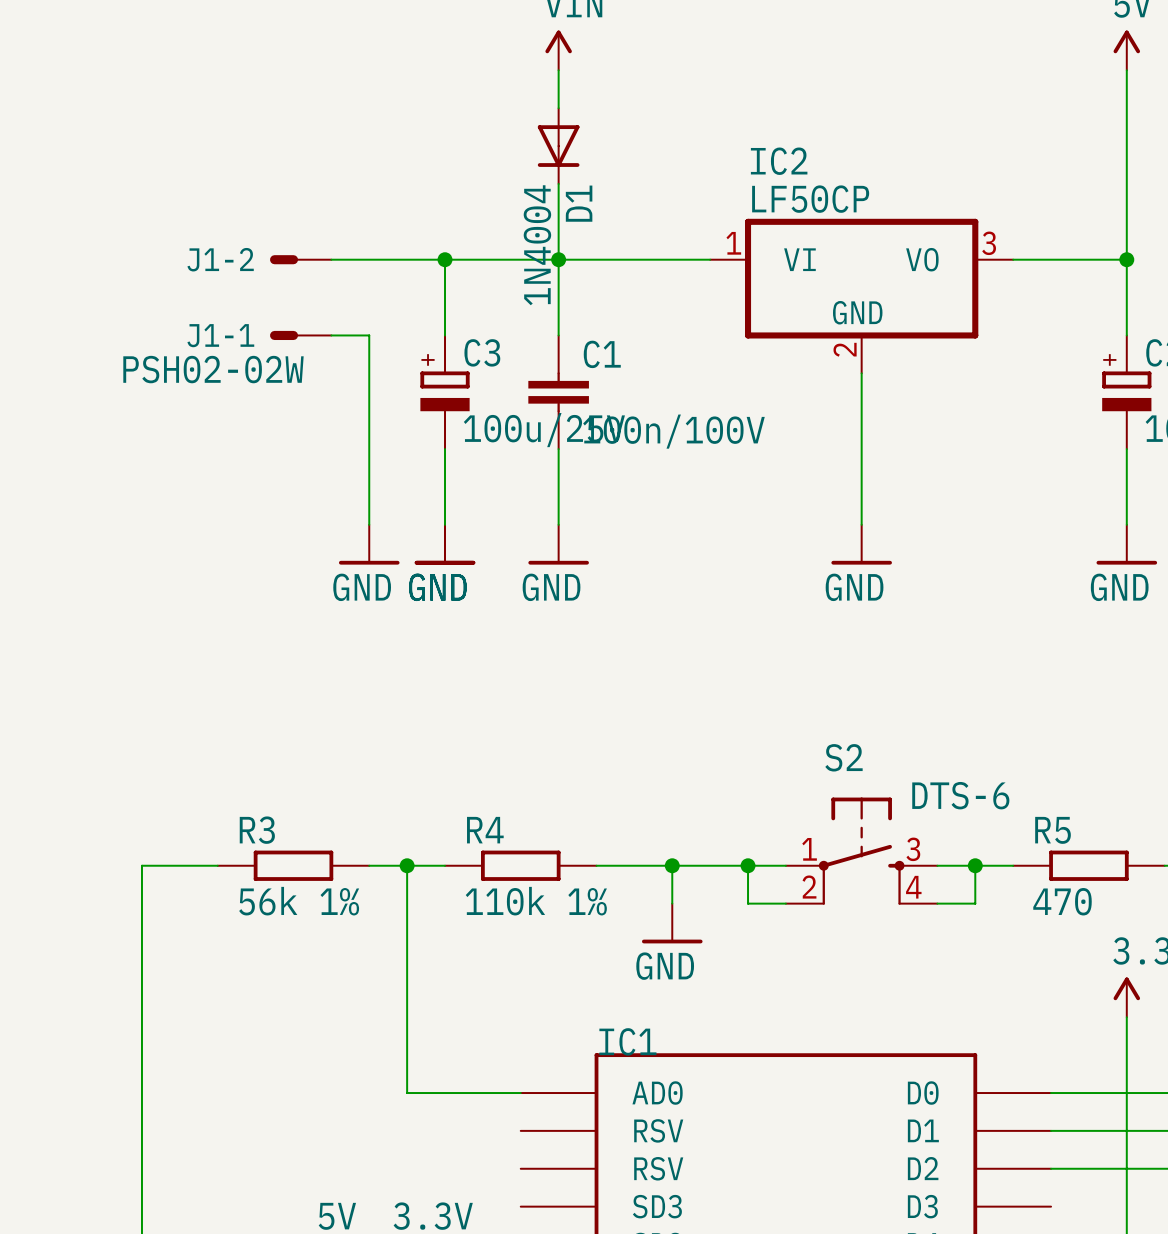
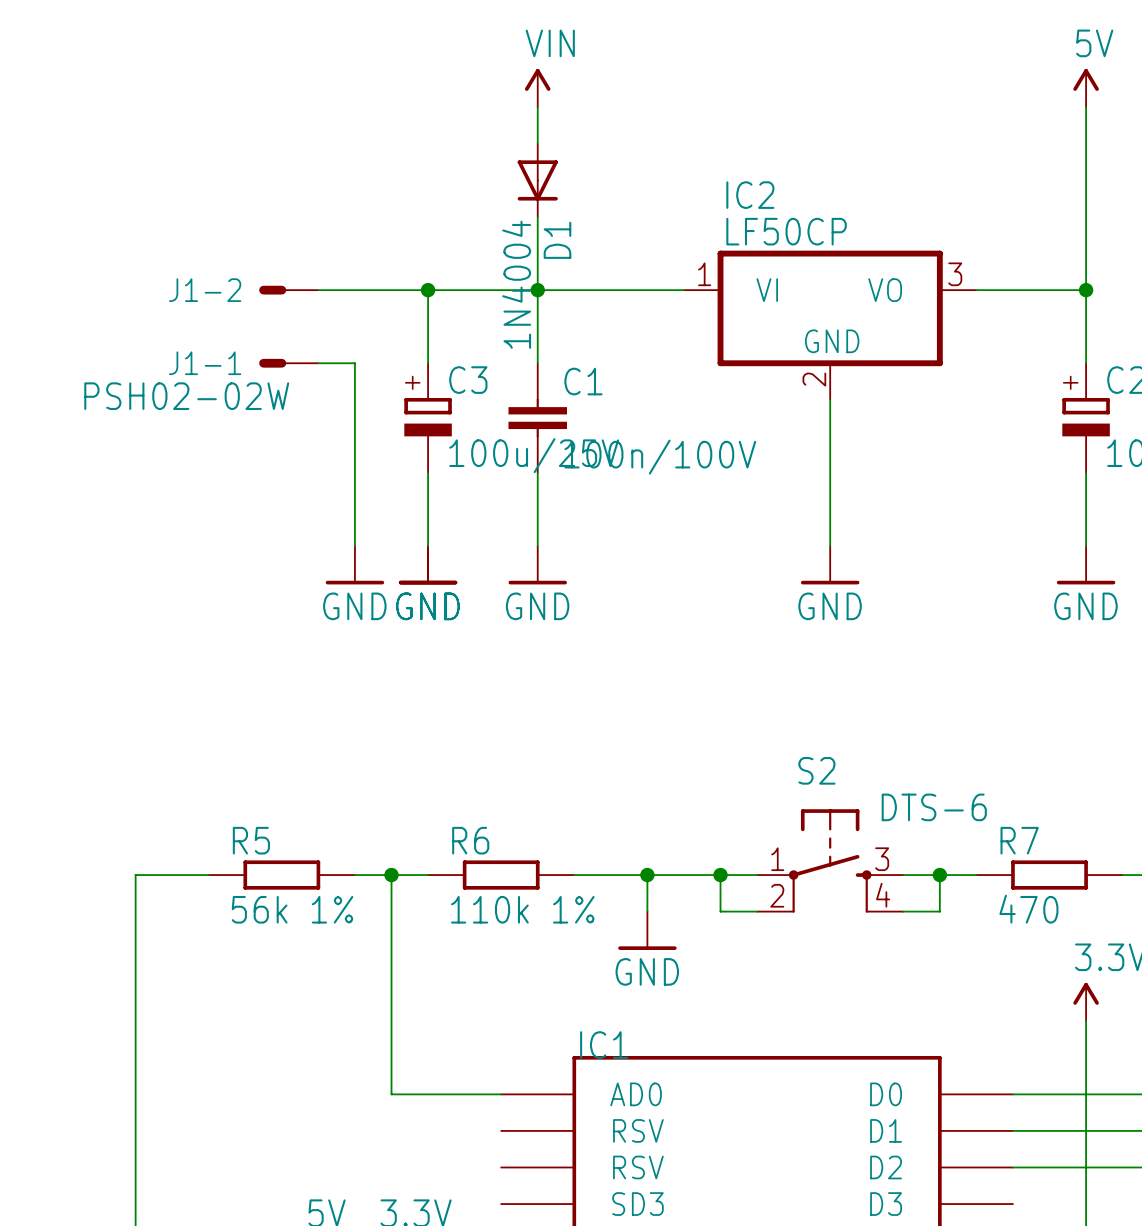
R3 name: R3 (257, 830) -> R5 (251, 840)
R4 name: R4 (485, 830) -> R6 (470, 840)
R5 name: R5 (1053, 830) -> R7 (1019, 840)

